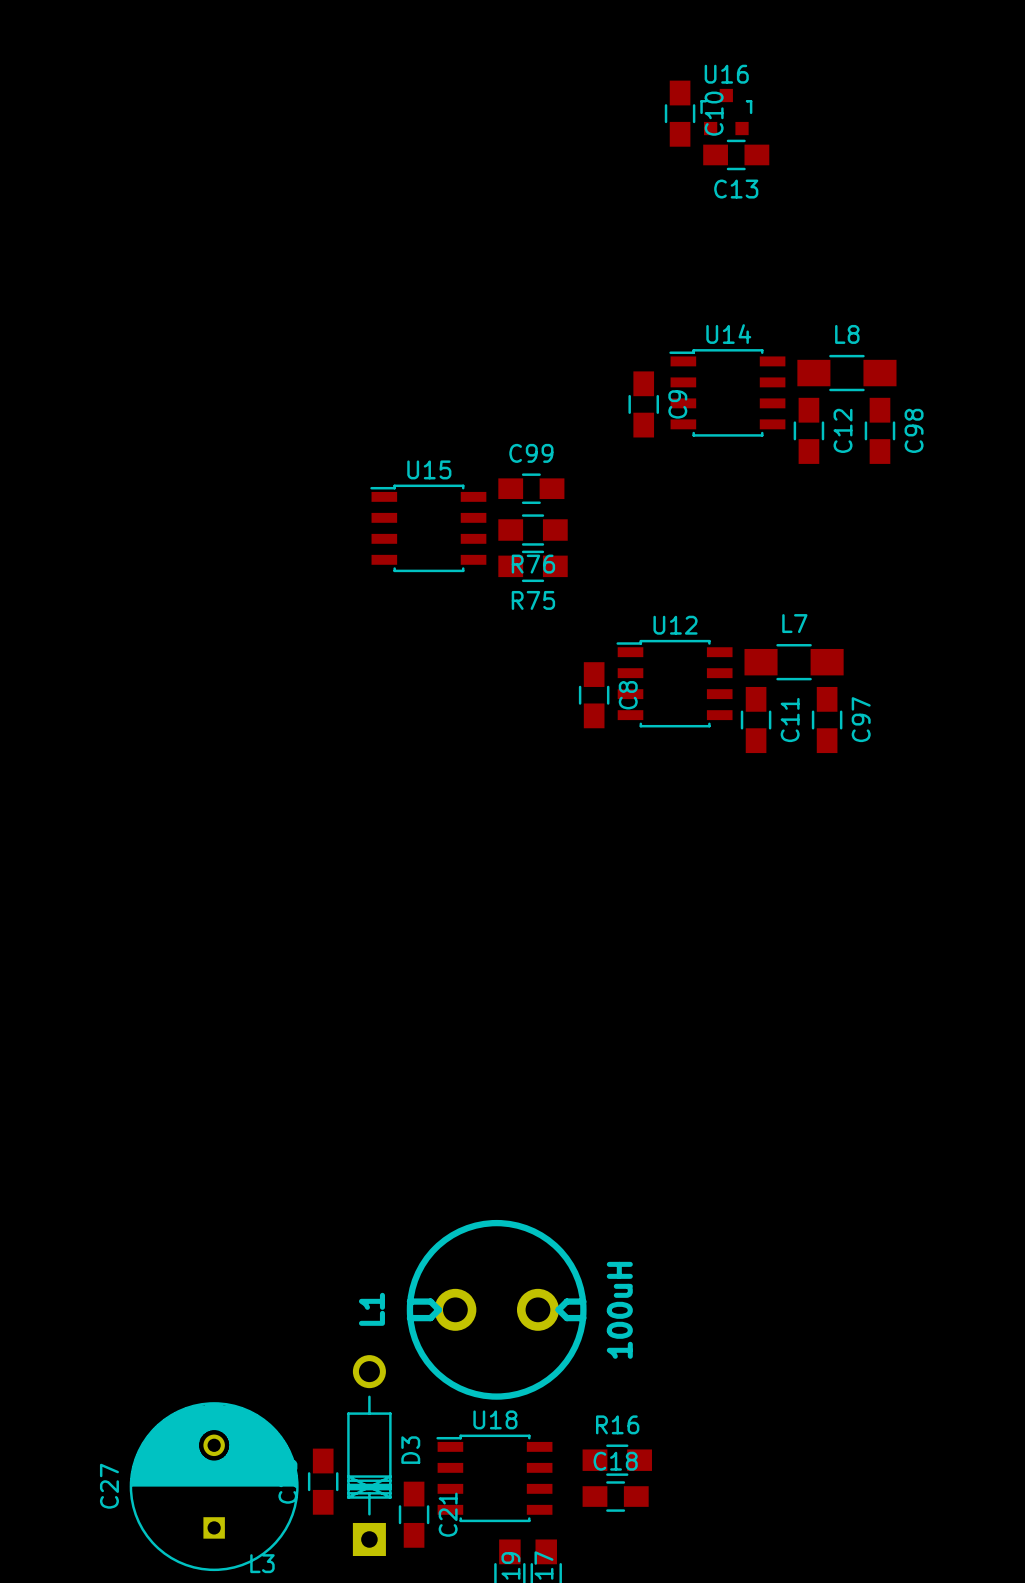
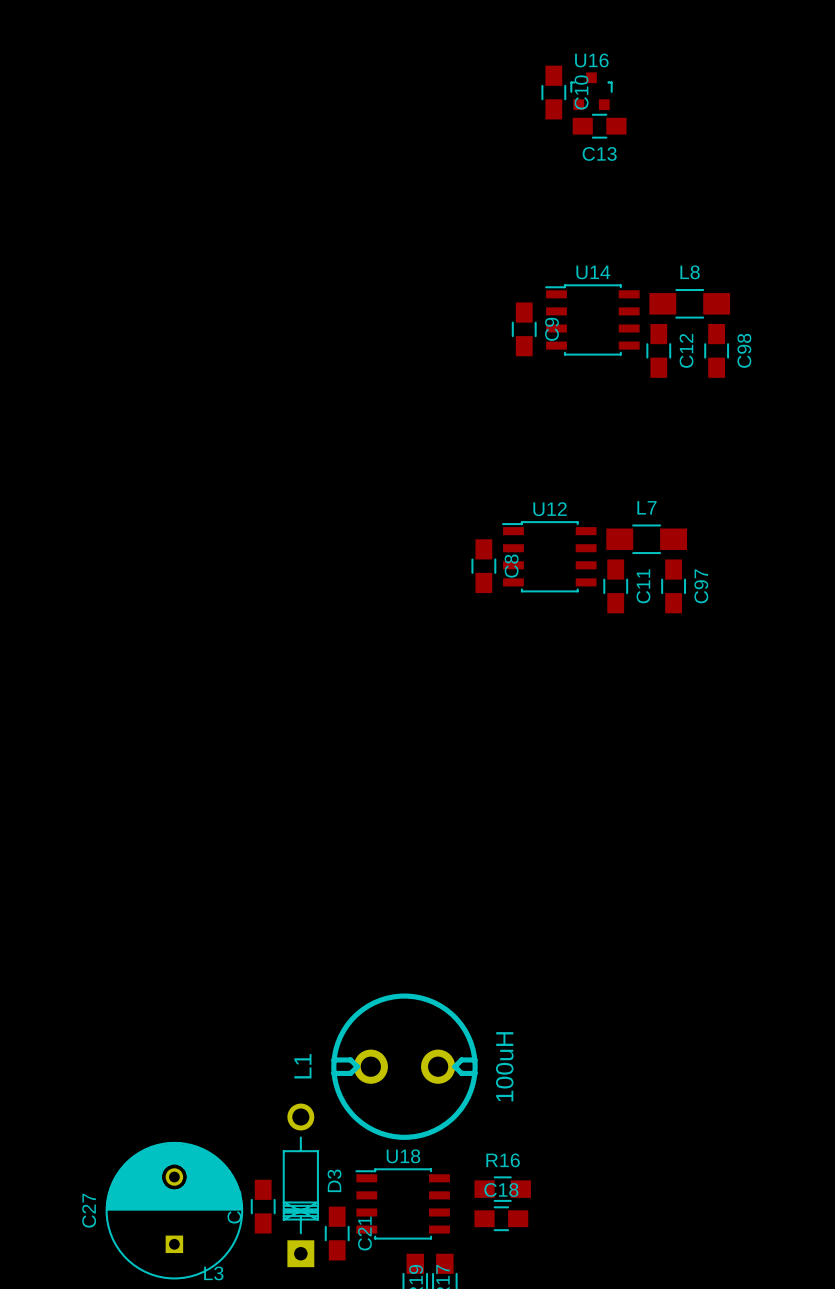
C99: (531, 488) -> none
U15: (428, 528) -> none
R76: (533, 530) -> none
R75: (533, 566) -> none

